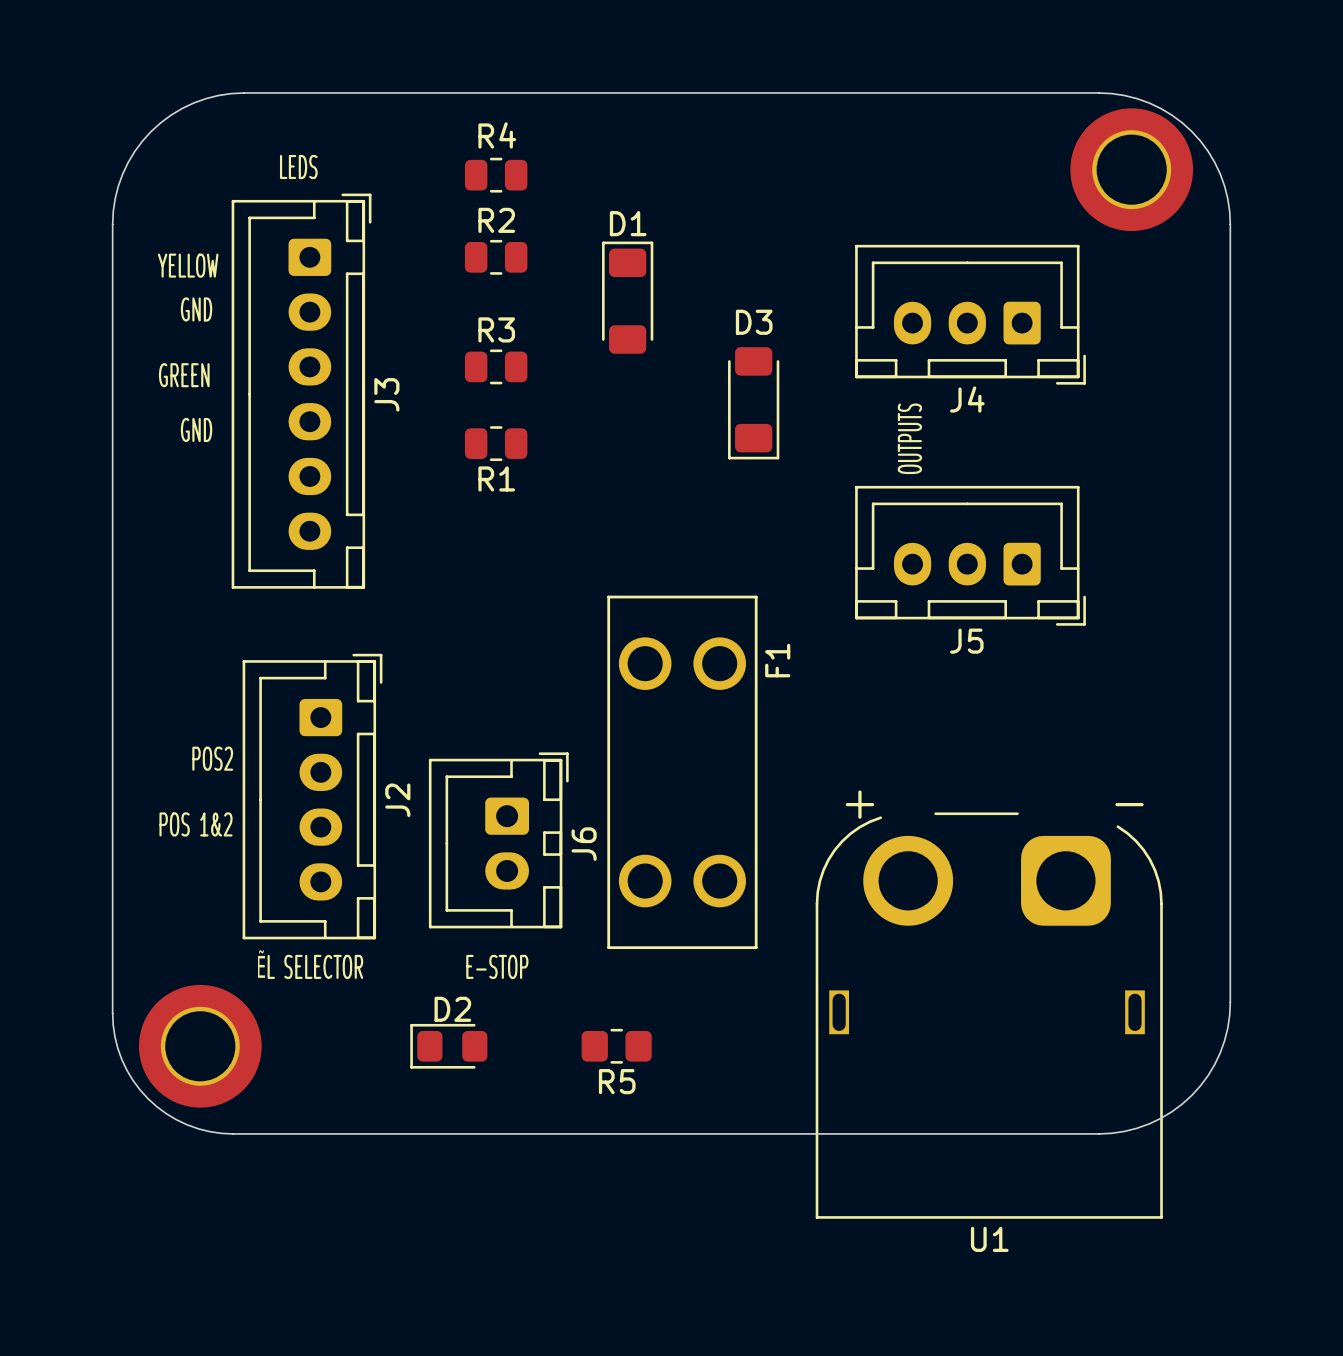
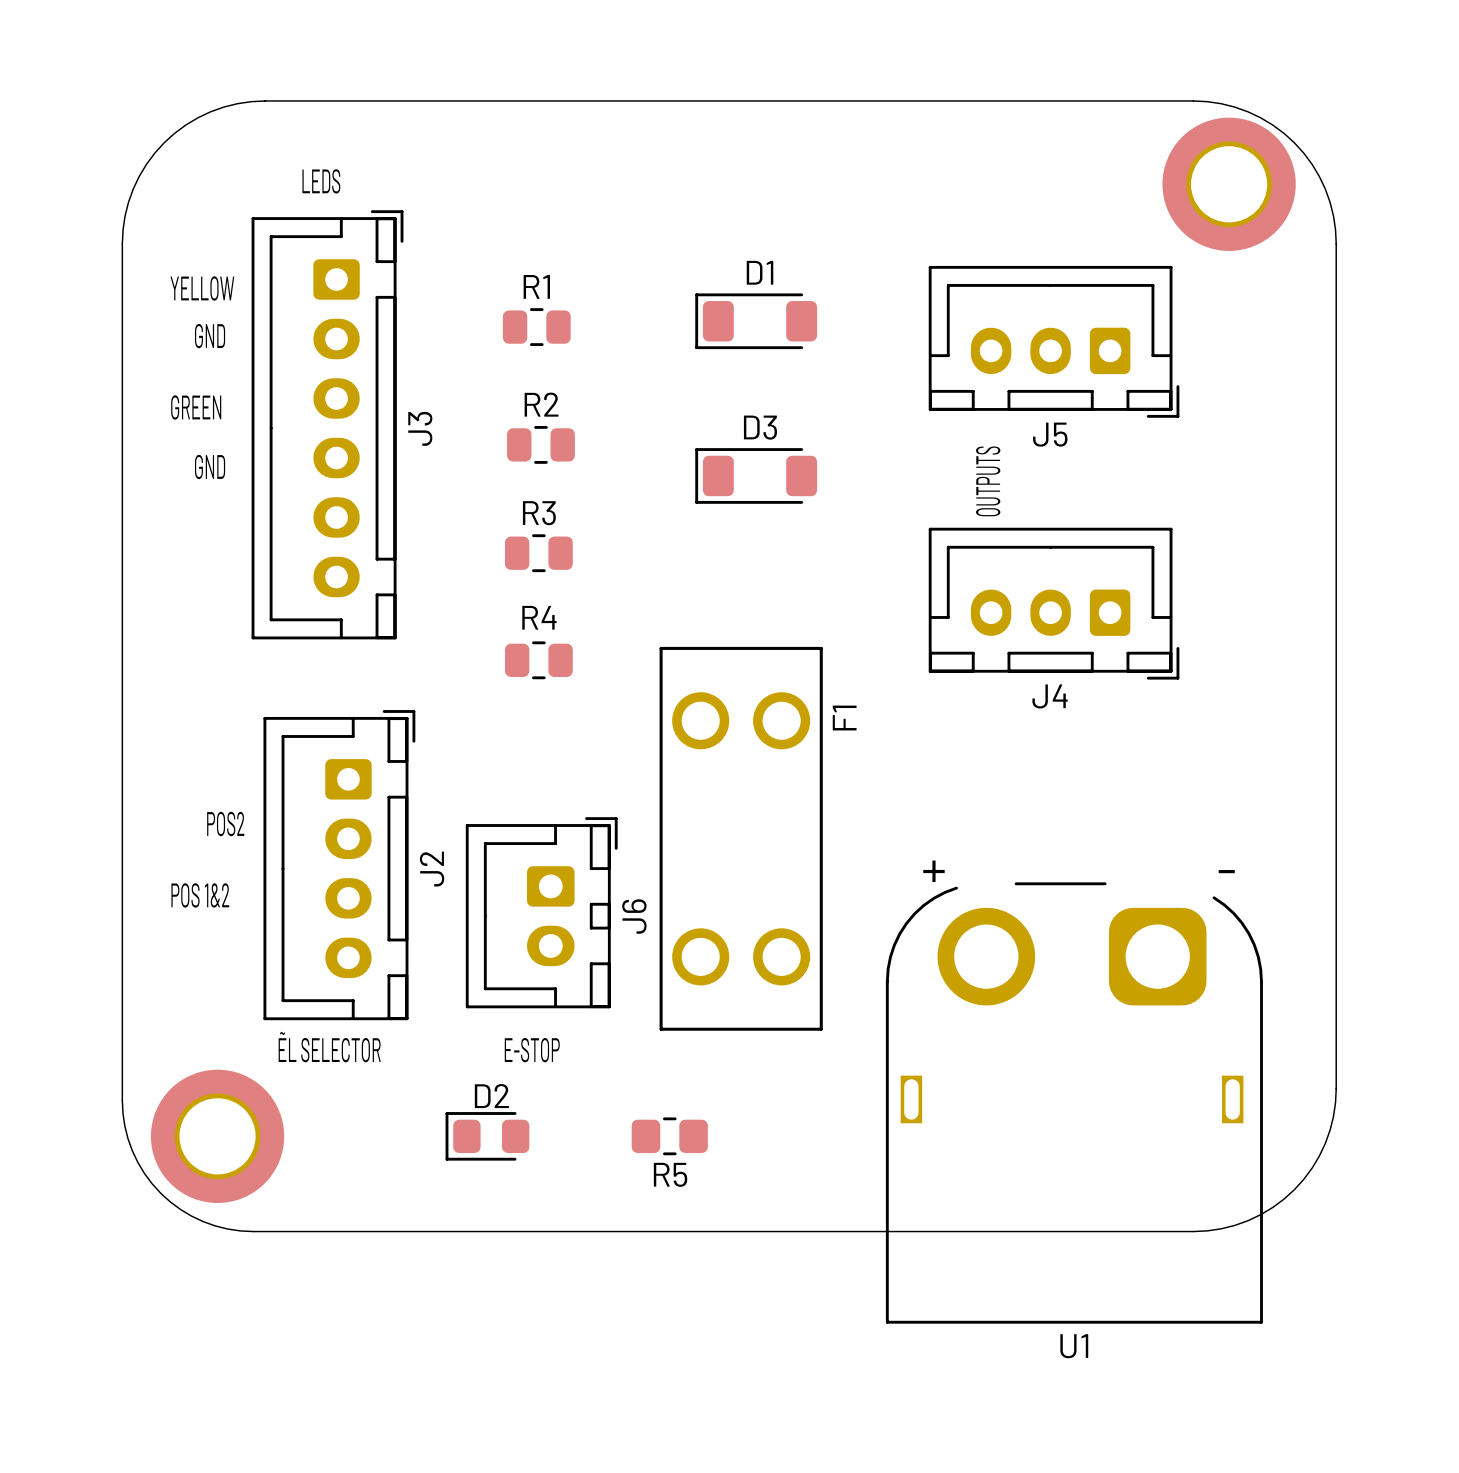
R4 position: (496, 175) -> (538, 660)
R2 position: (496, 257) -> (540, 444)
D1 rotation: 0° (627, 297) -> 90° counterclockwise (756, 321)
D1 position: (627, 297) -> (756, 321)
R3 position: (496, 366) -> (538, 553)
J4 name: J4 (967, 399) -> J5 (1050, 434)
D3 rotation: 0° (753, 403) -> 90° clockwise (756, 475)
R1 position: (496, 443) -> (536, 327)
R1 name position: R1 (496, 478) -> R1 (536, 286)
J5 name: J5 (966, 641) -> J4 (1050, 696)

